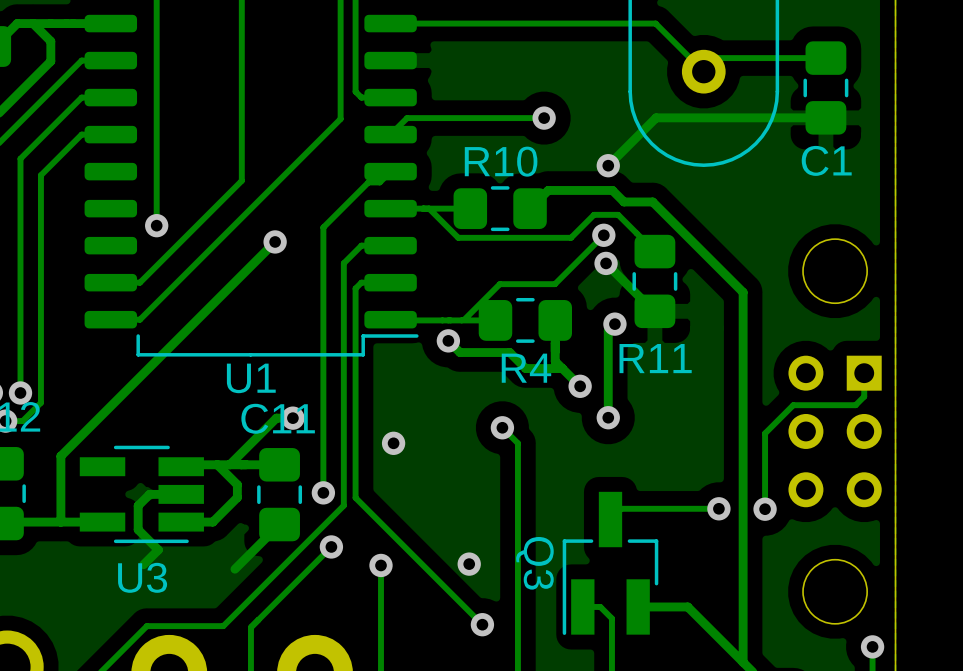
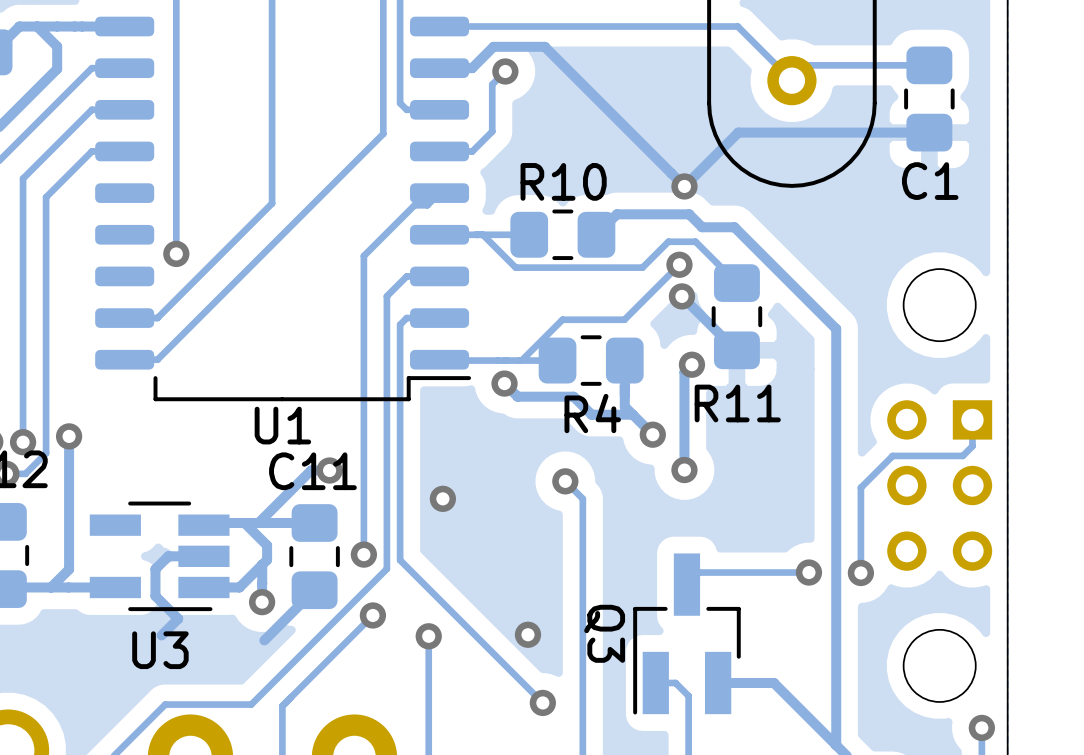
track: none -> (439, 68) (472, 68) (493, 46) (544, 46) (684, 186)
track: (544, 118) (407, 118) (390, 134) -> (505, 71) (492, 84) (492, 131) (472, 151) (439, 151)
via position: (544, 118) -> (505, 71)
track: (275, 241) (60, 456) (60, 522) -> none
via: (275, 241) -> none
track: none -> (69, 436) (69, 569) (51, 587)
via: none -> (69, 436)
via: none -> (262, 602)

